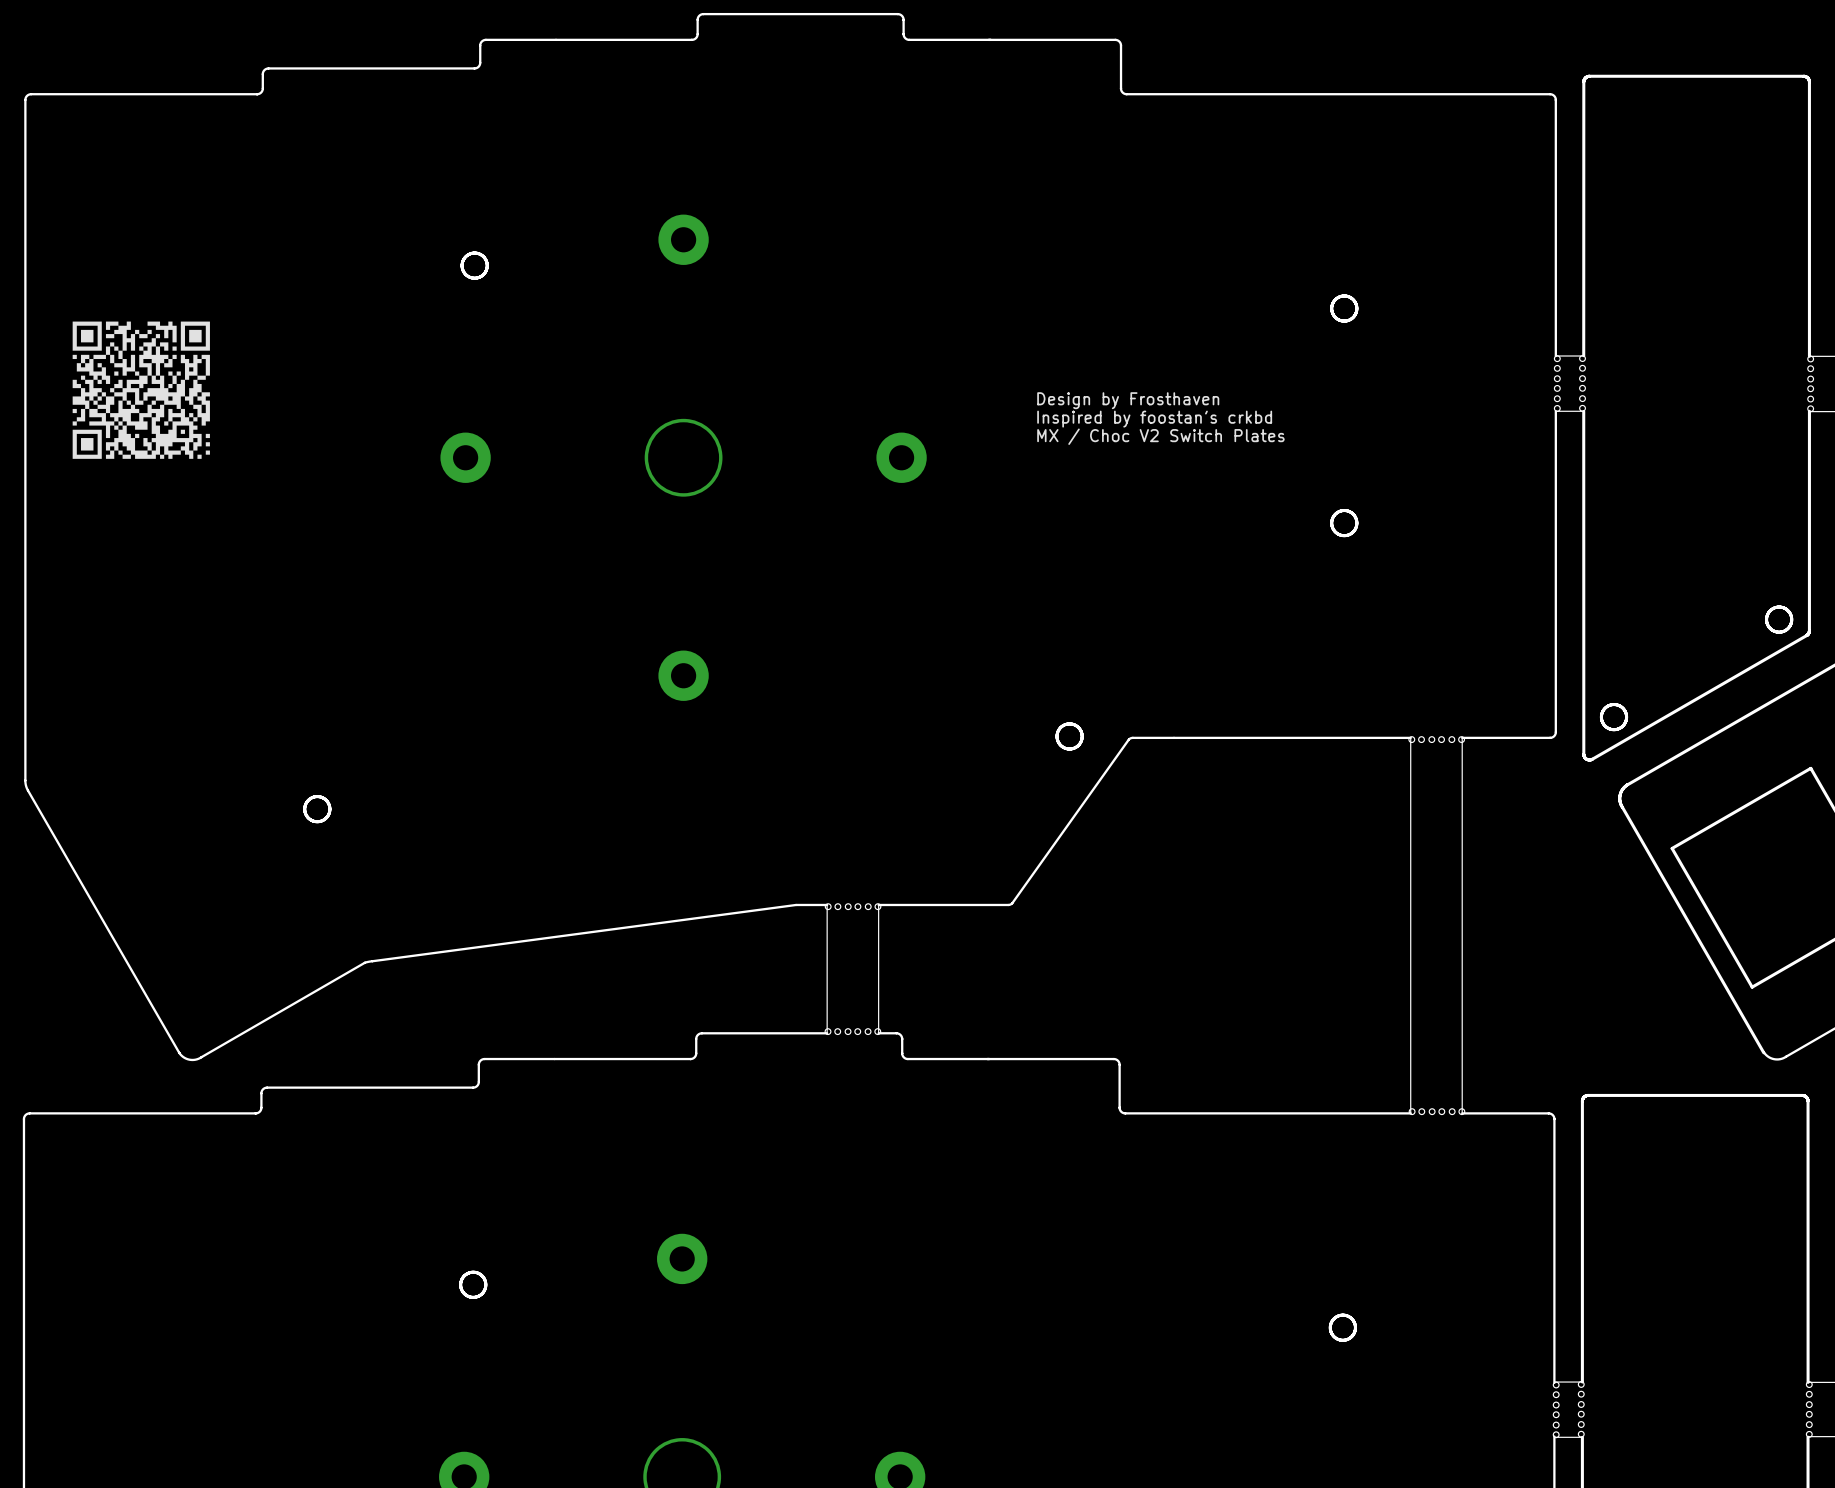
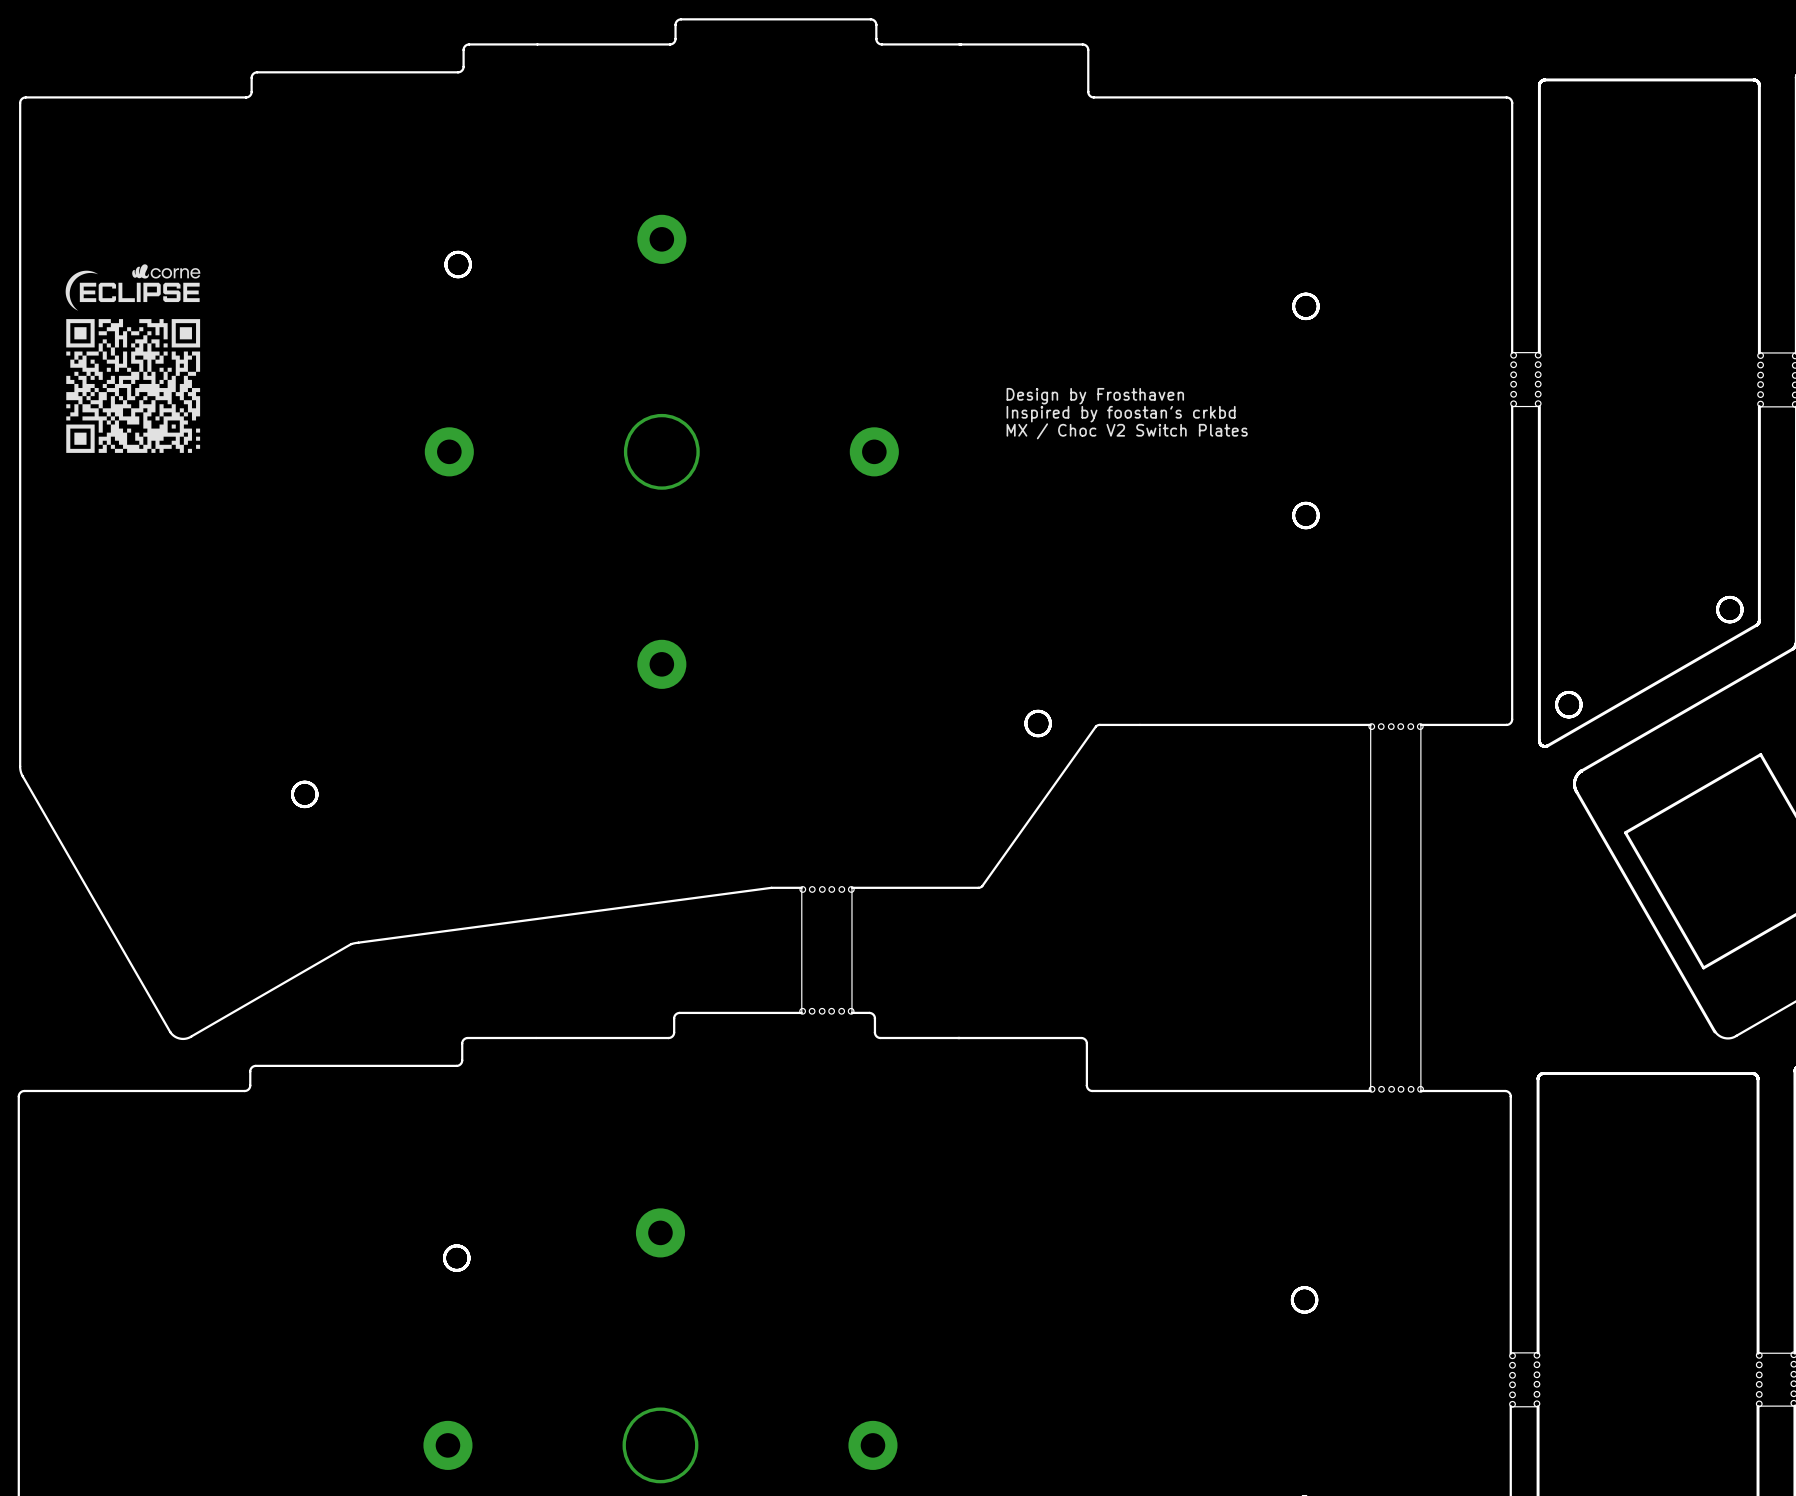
drawing: none -> [65, 264, 201, 311]

